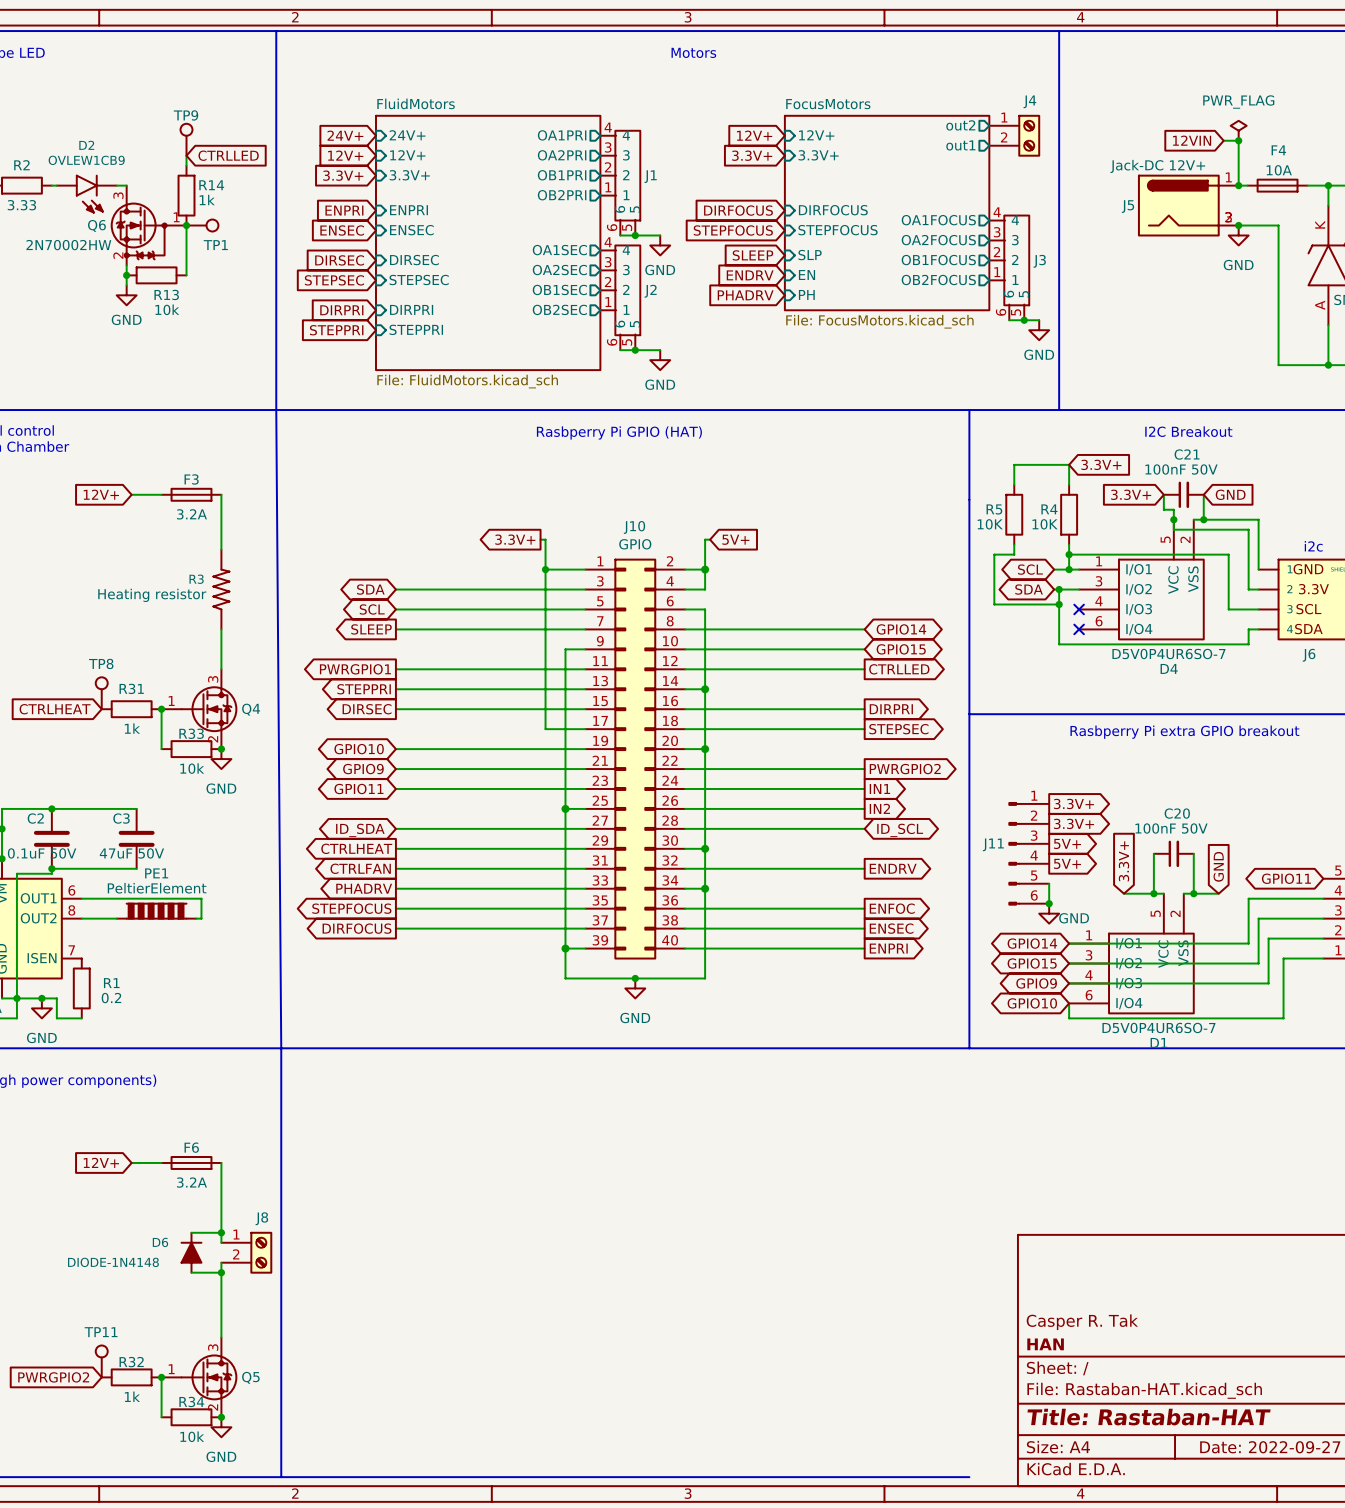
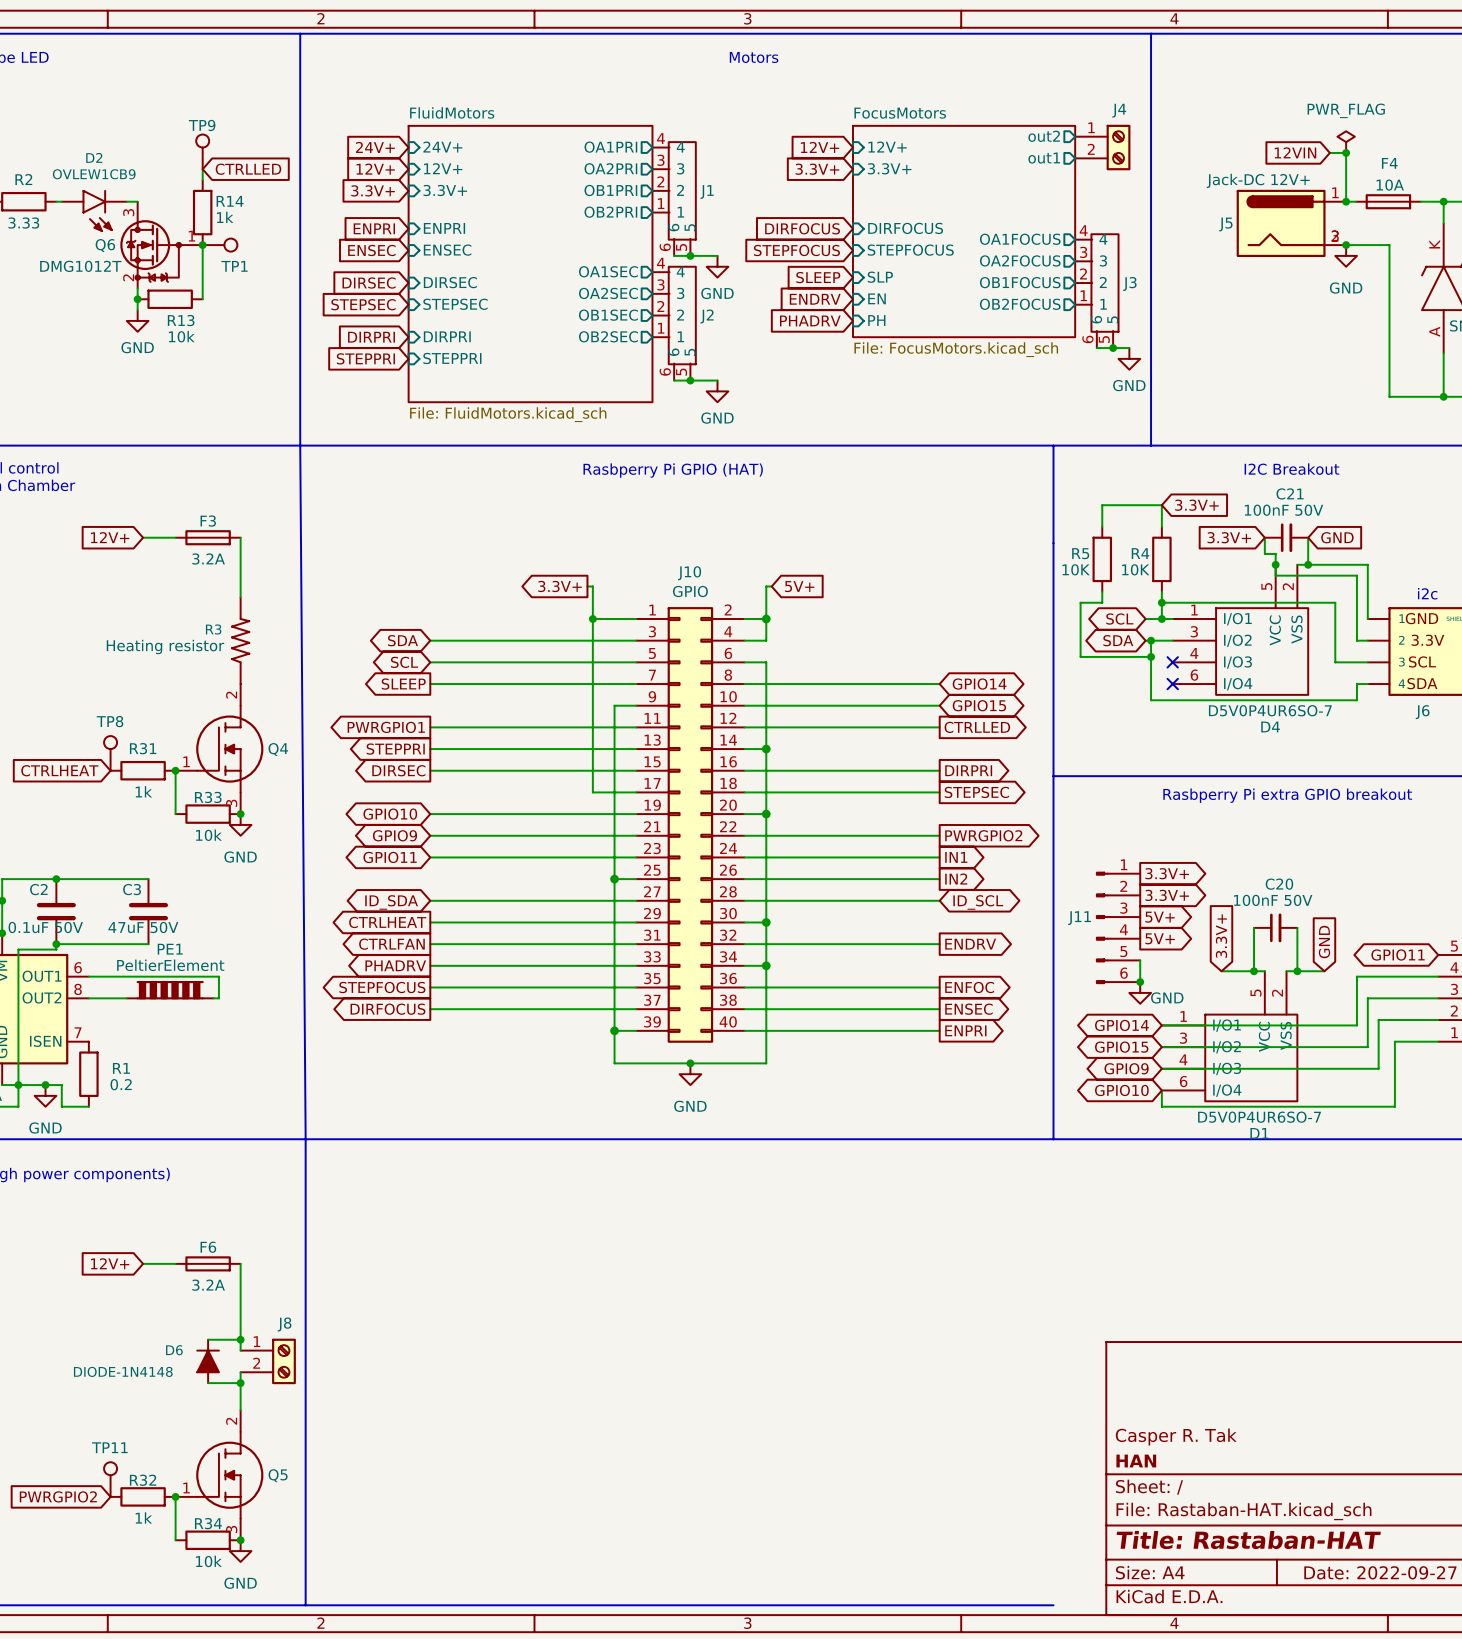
Q6 value: 2N70002HW (68, 245) -> DMG1012T (80, 266)
Q4 symbol: [161, 669, 238, 750] -> [175, 684, 264, 815]
Q5 symbol: [161, 1337, 238, 1418] -> [175, 1410, 264, 1541]

